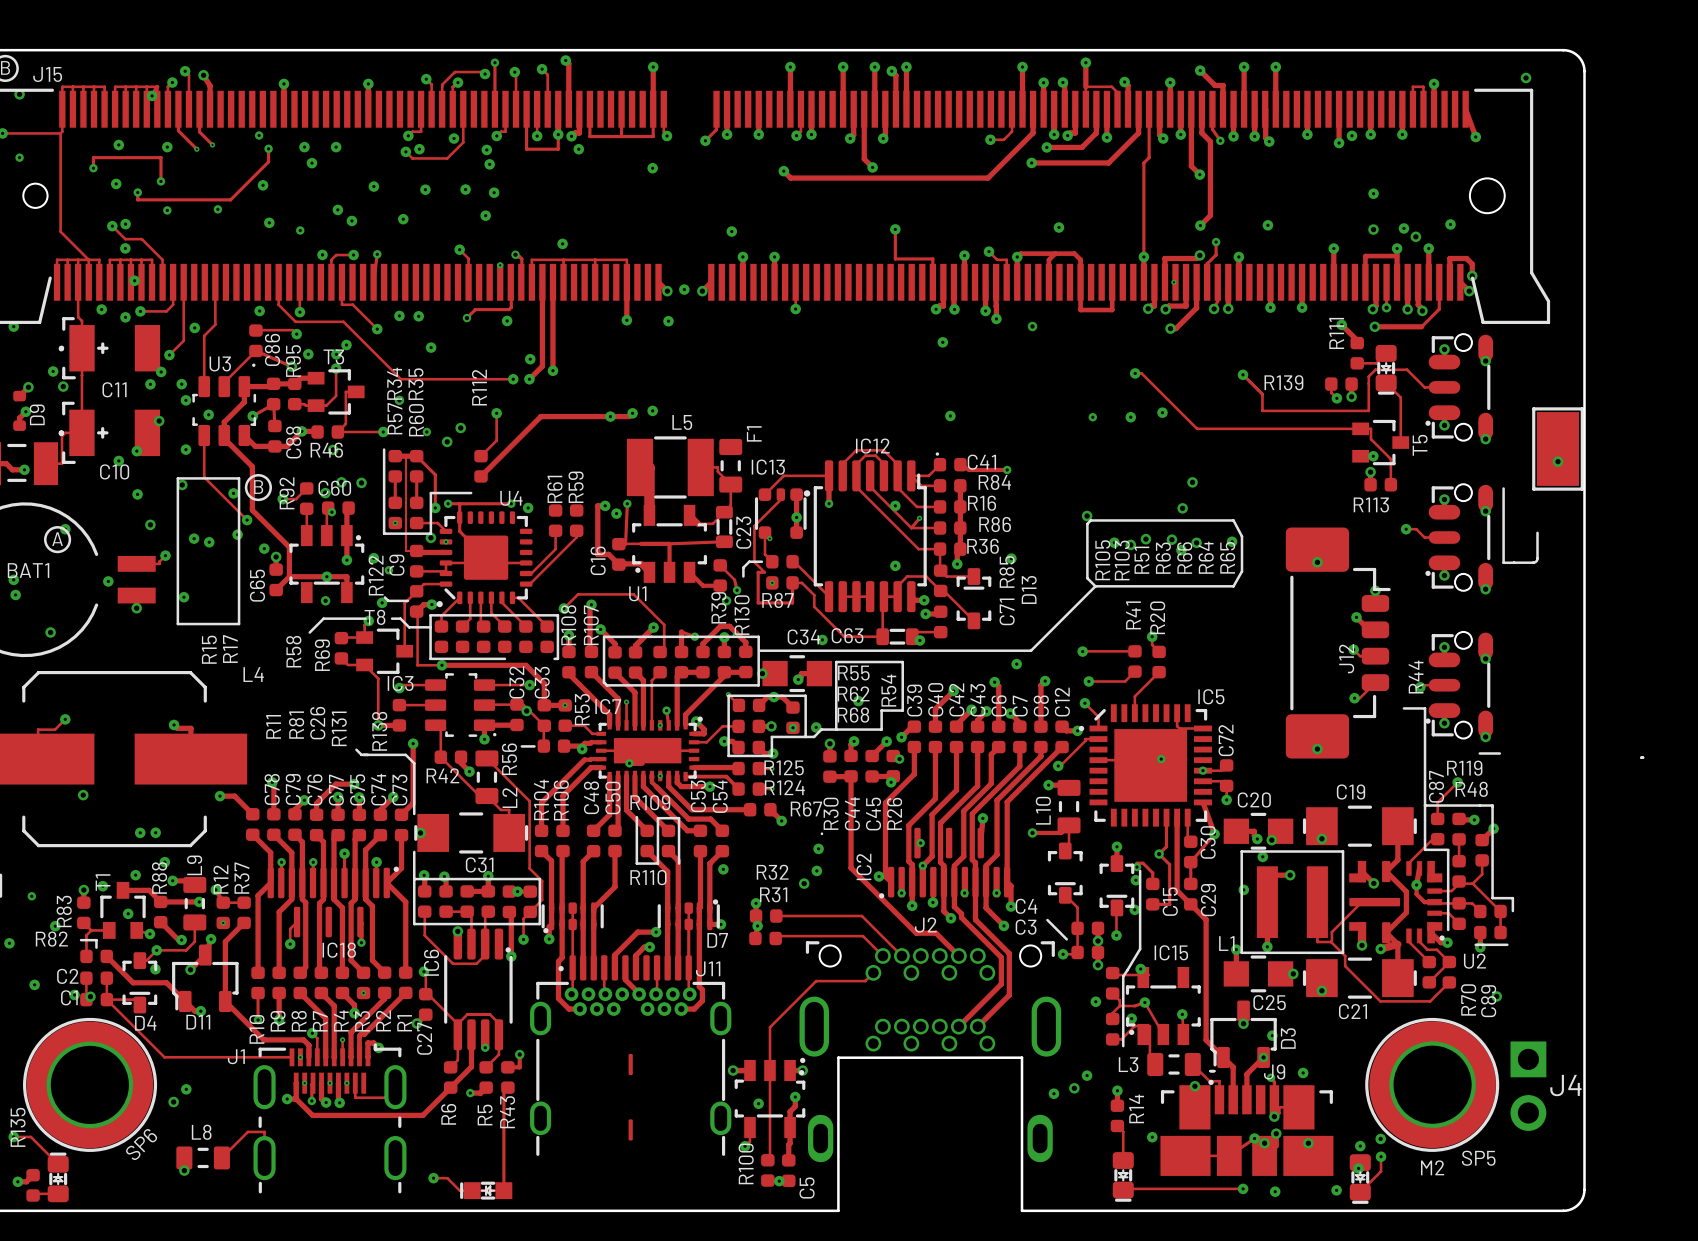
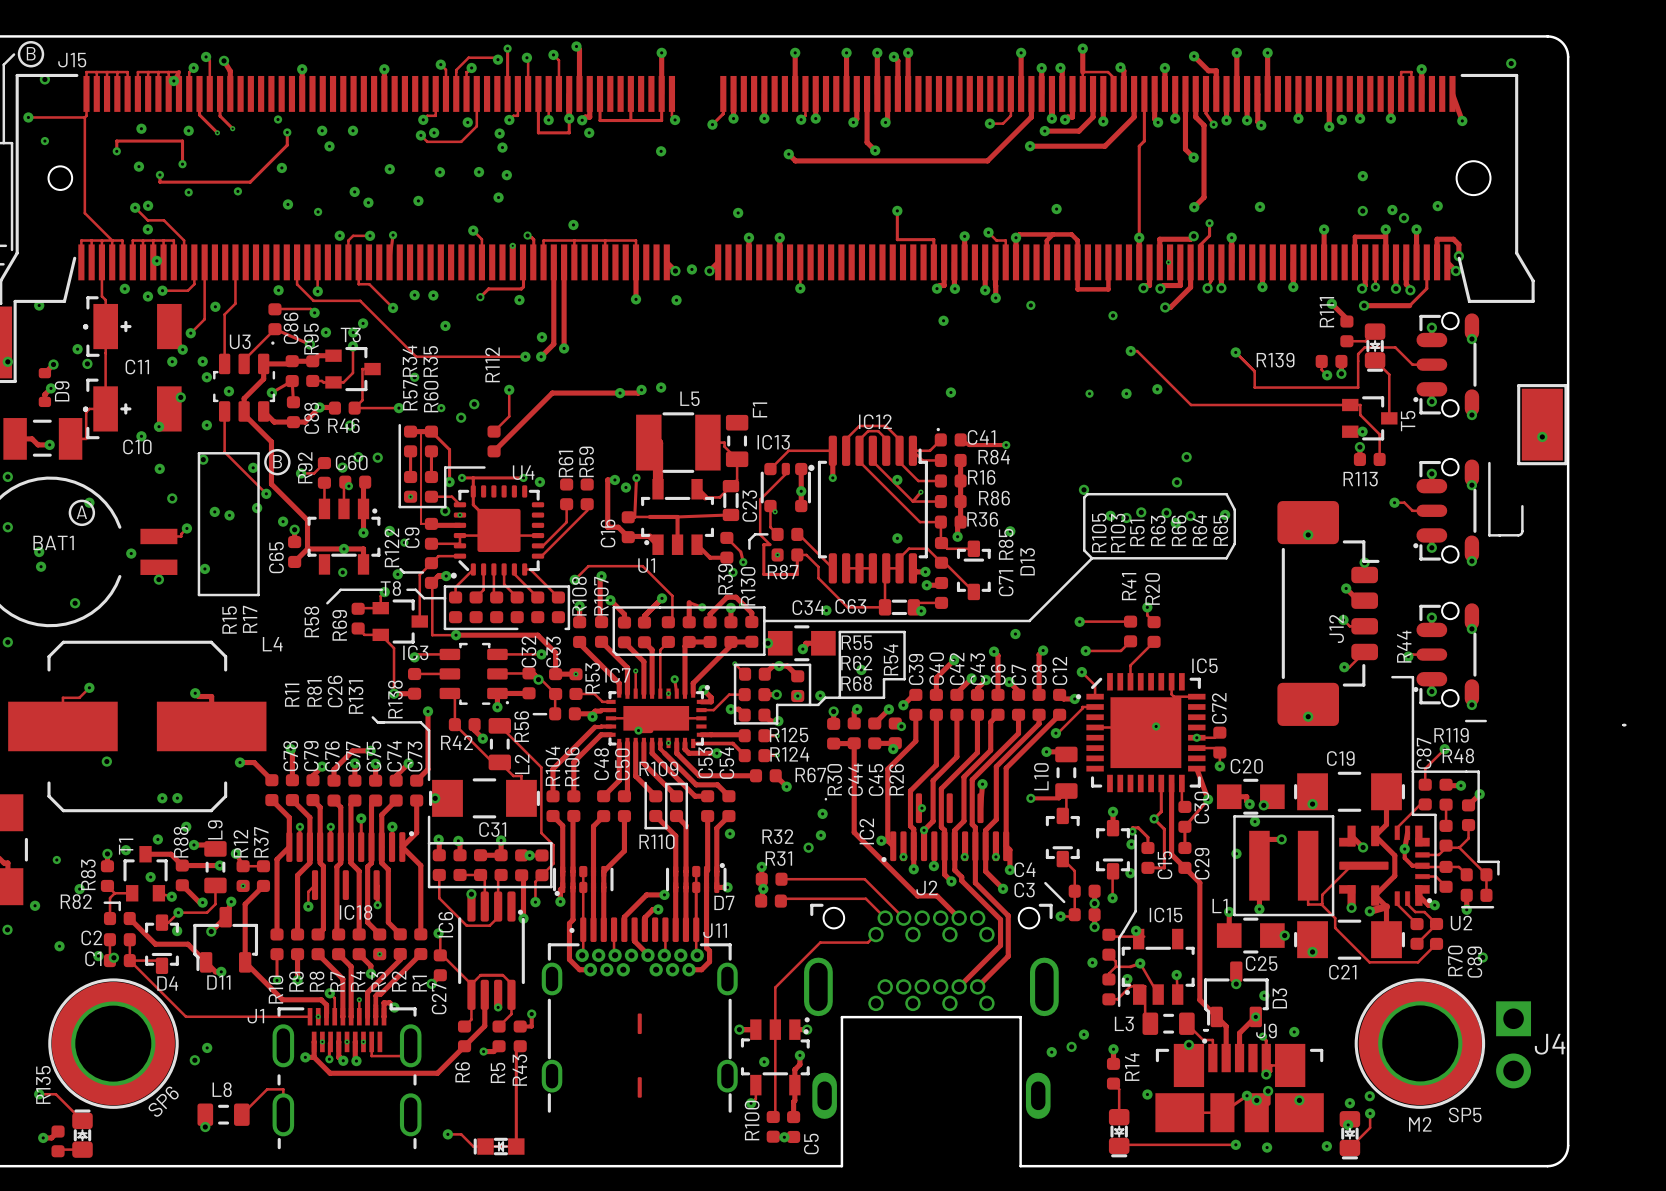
via: none -> (1113, 315)

